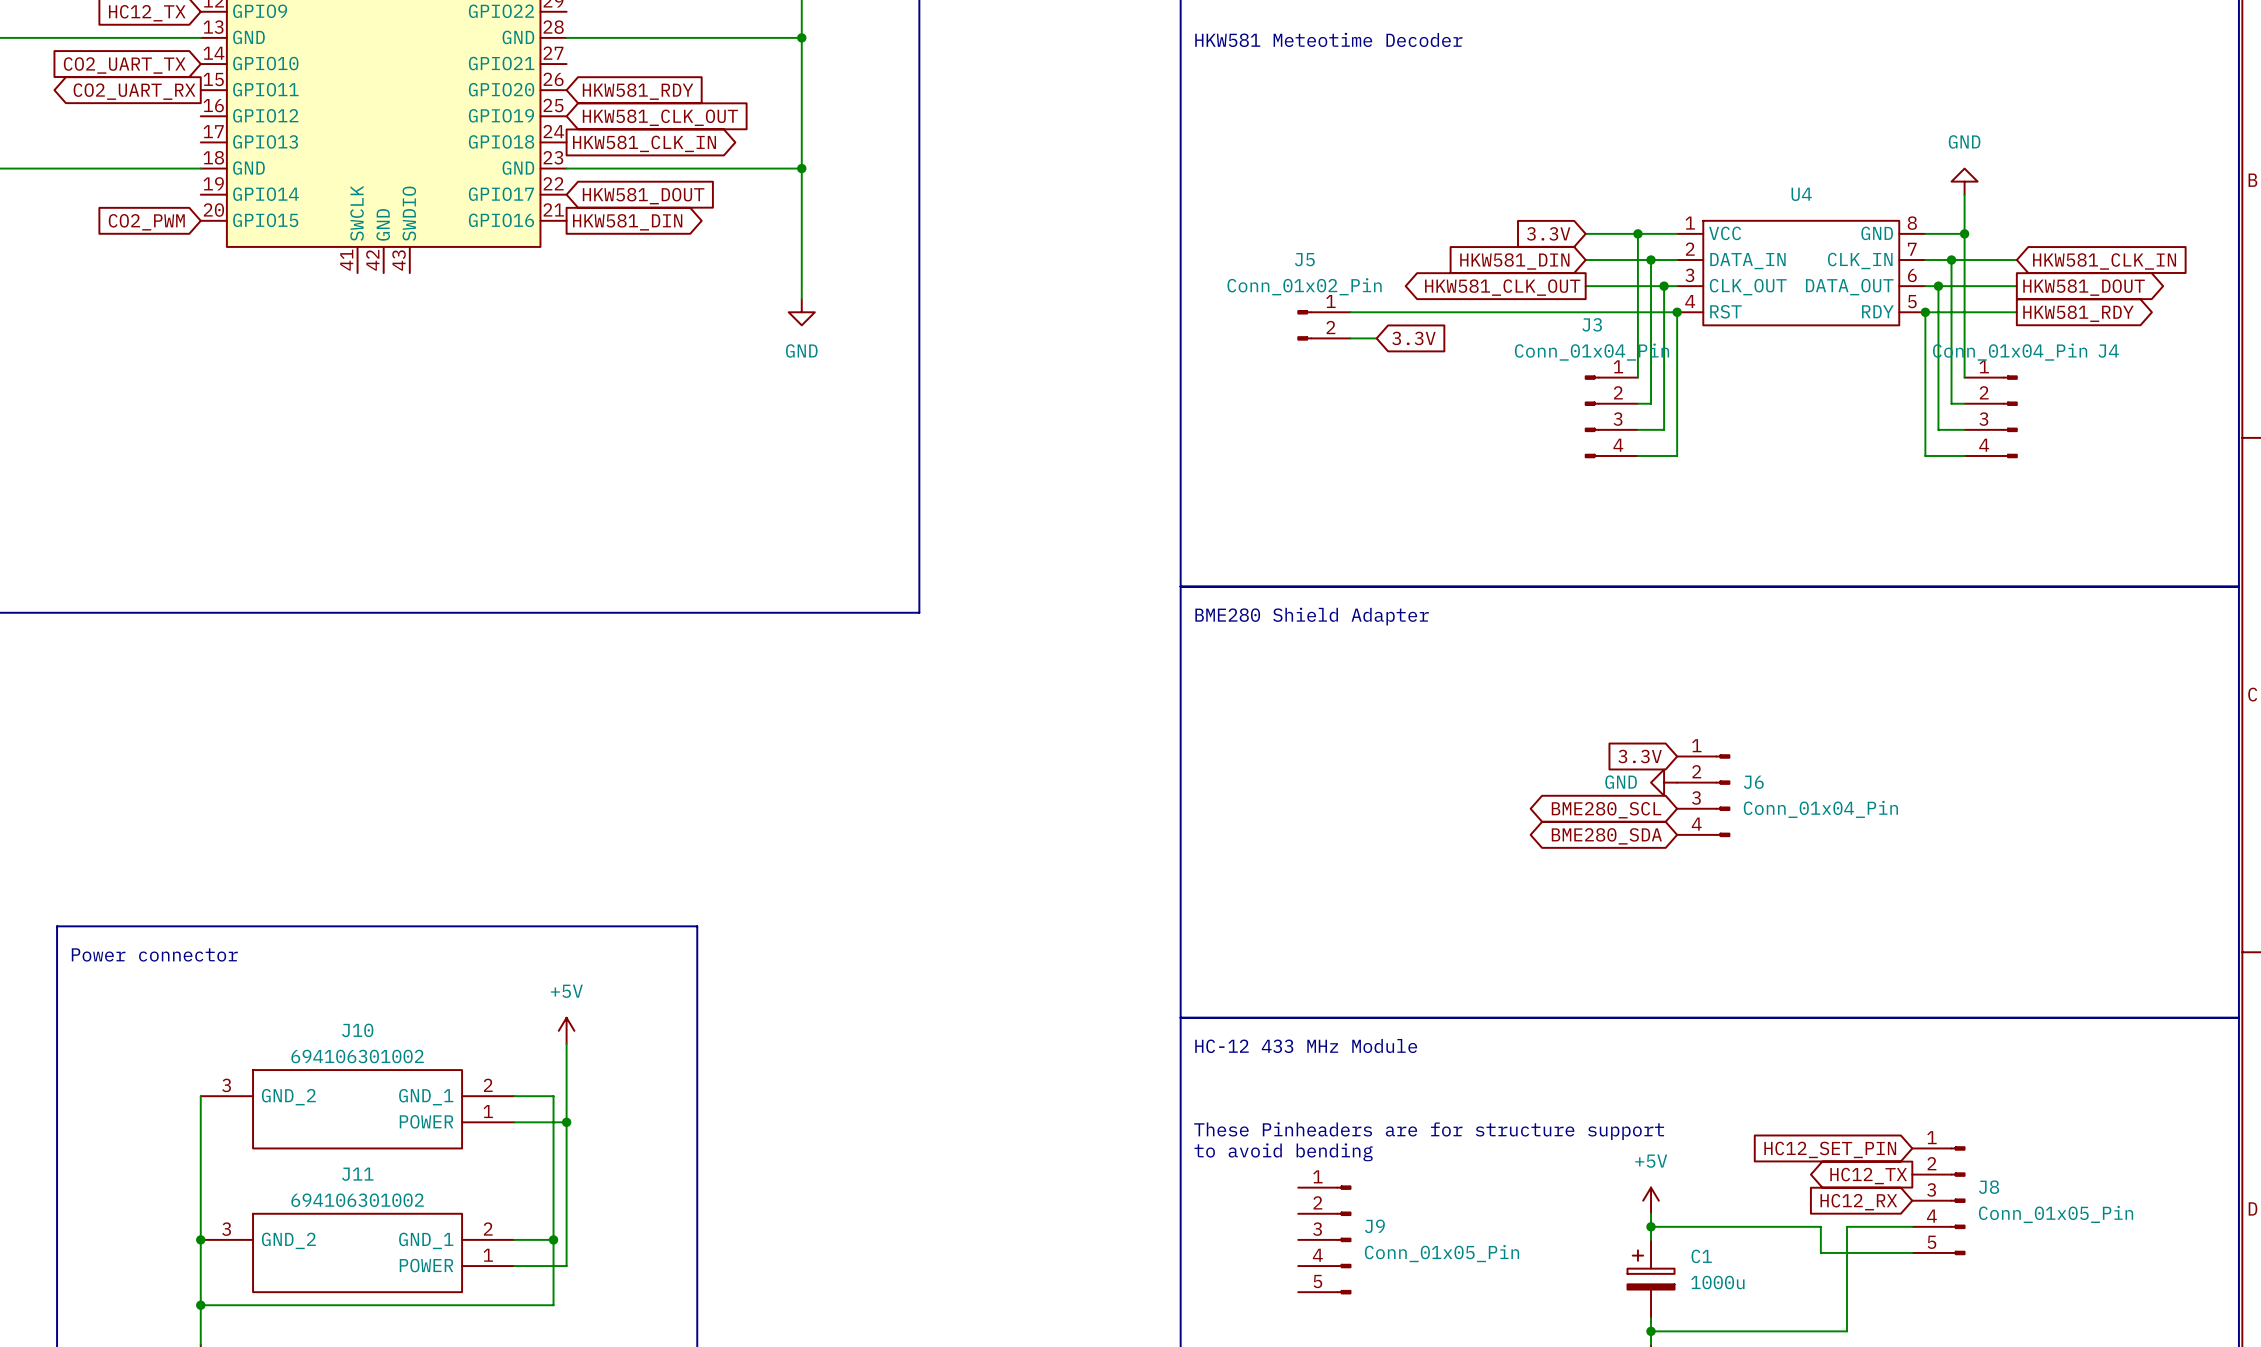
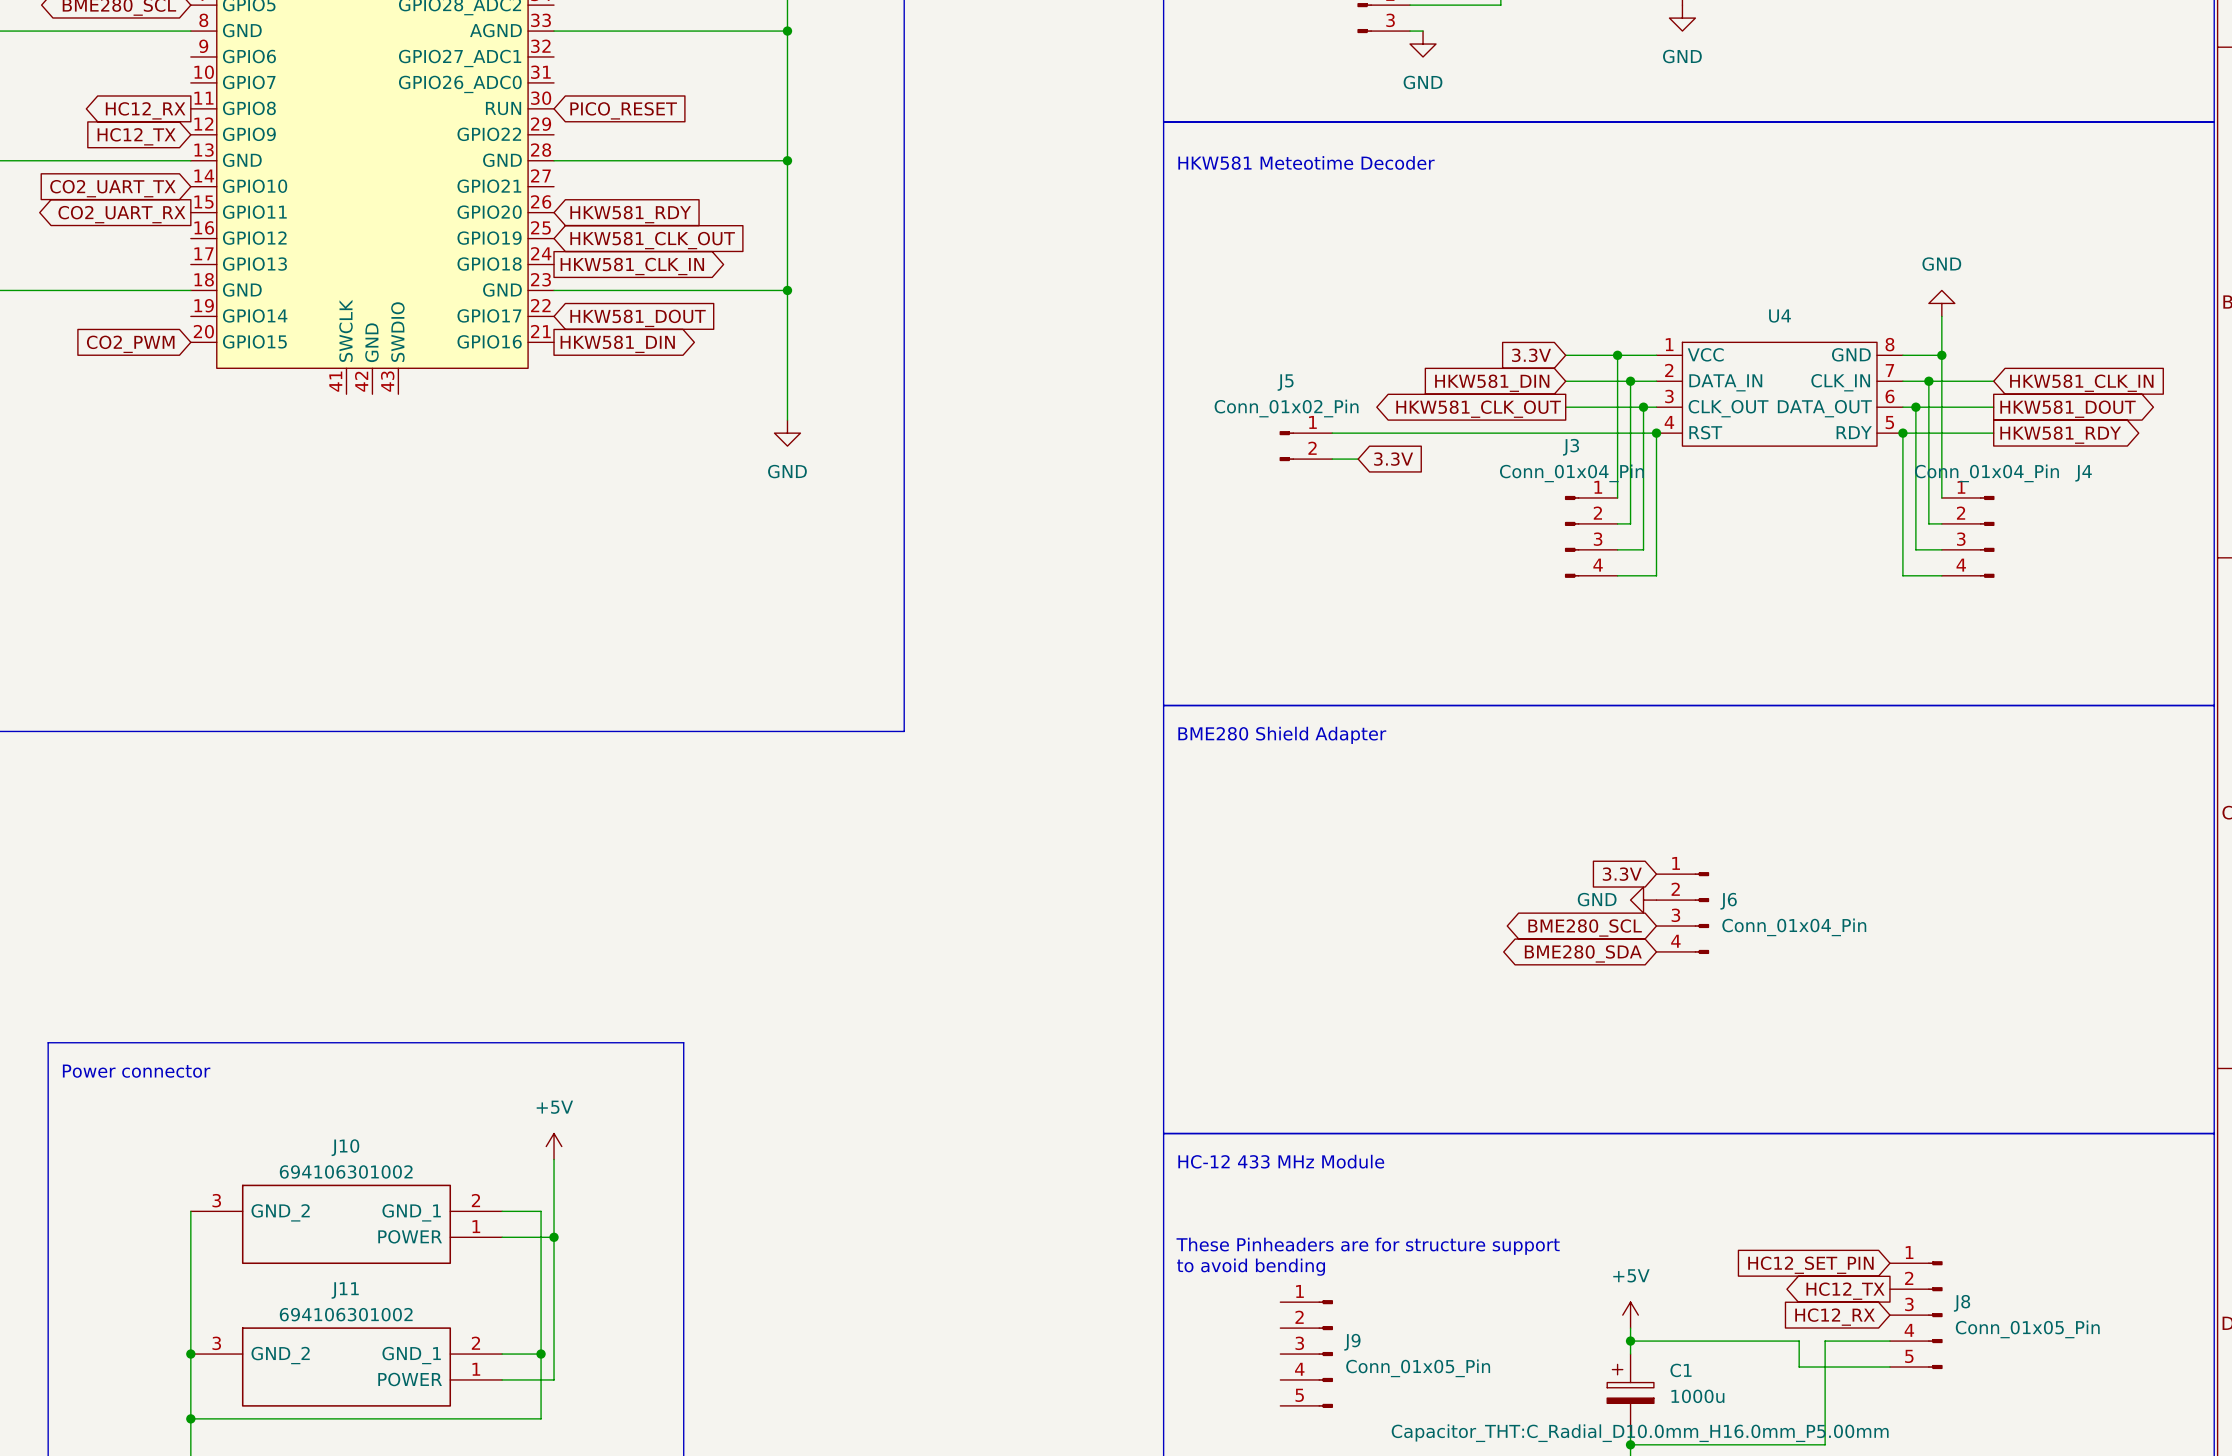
C1 text: none -> Capacitor_THT:C_Radial_D10.0mm_H16.0mm_P5.00mm (1640, 1433)

